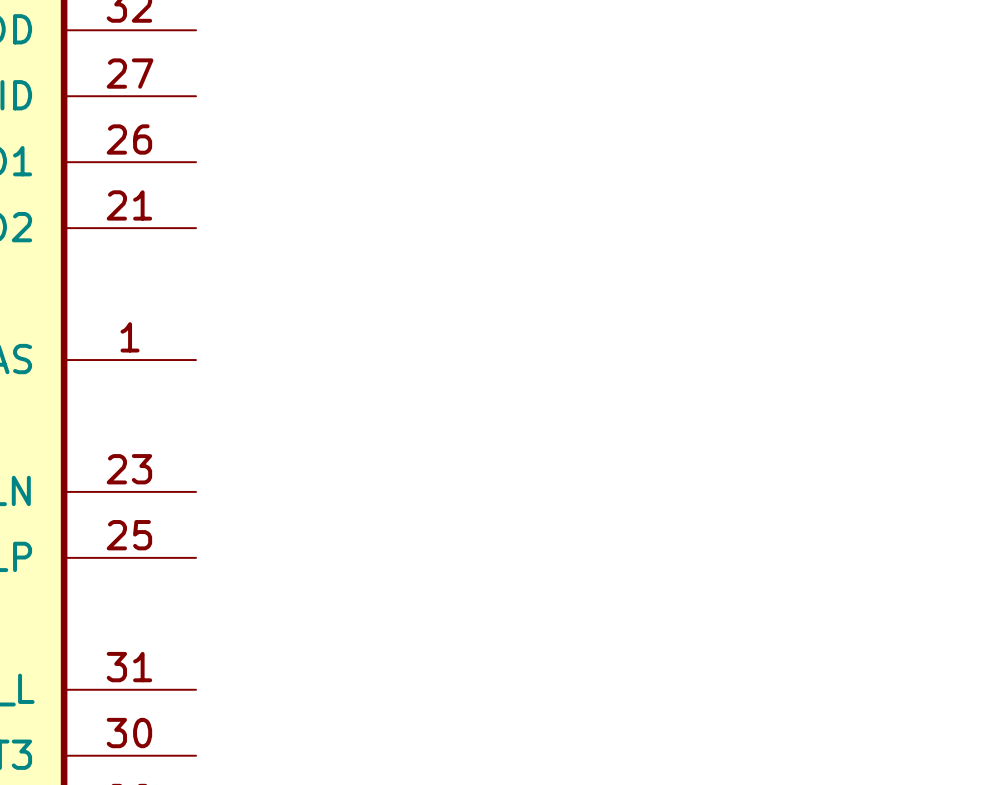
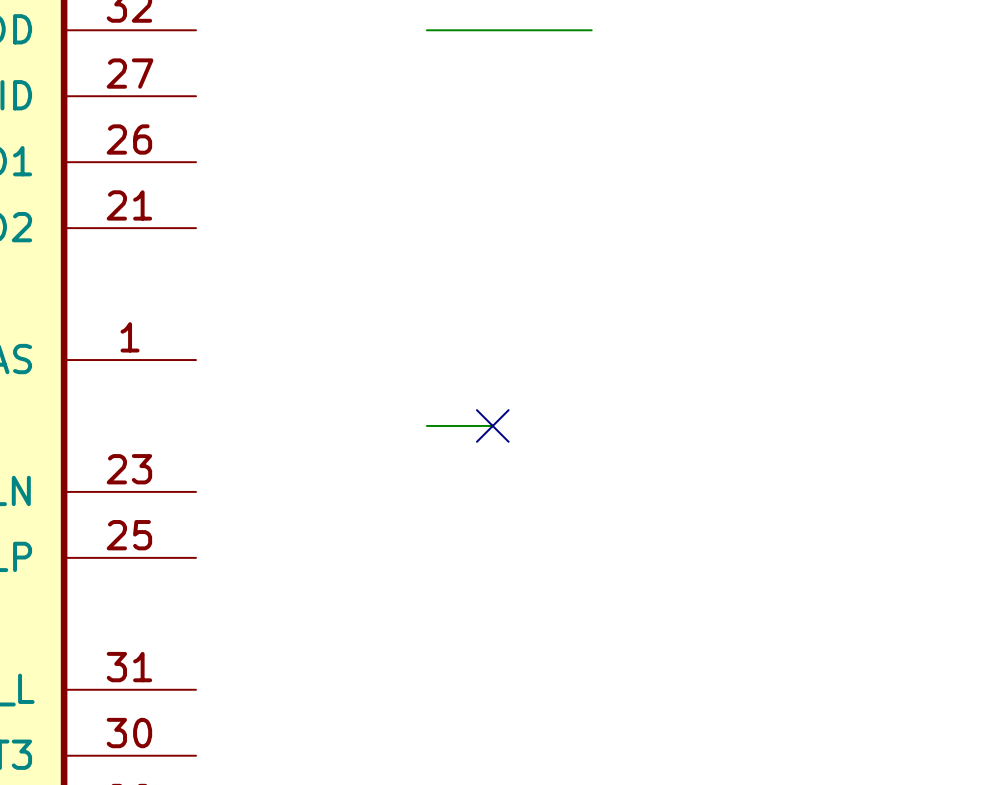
wire: none -> (426, 30) (591, 30)
wire: none -> (426, 425) (492, 425)
no-connect mark: none -> (492, 425)

